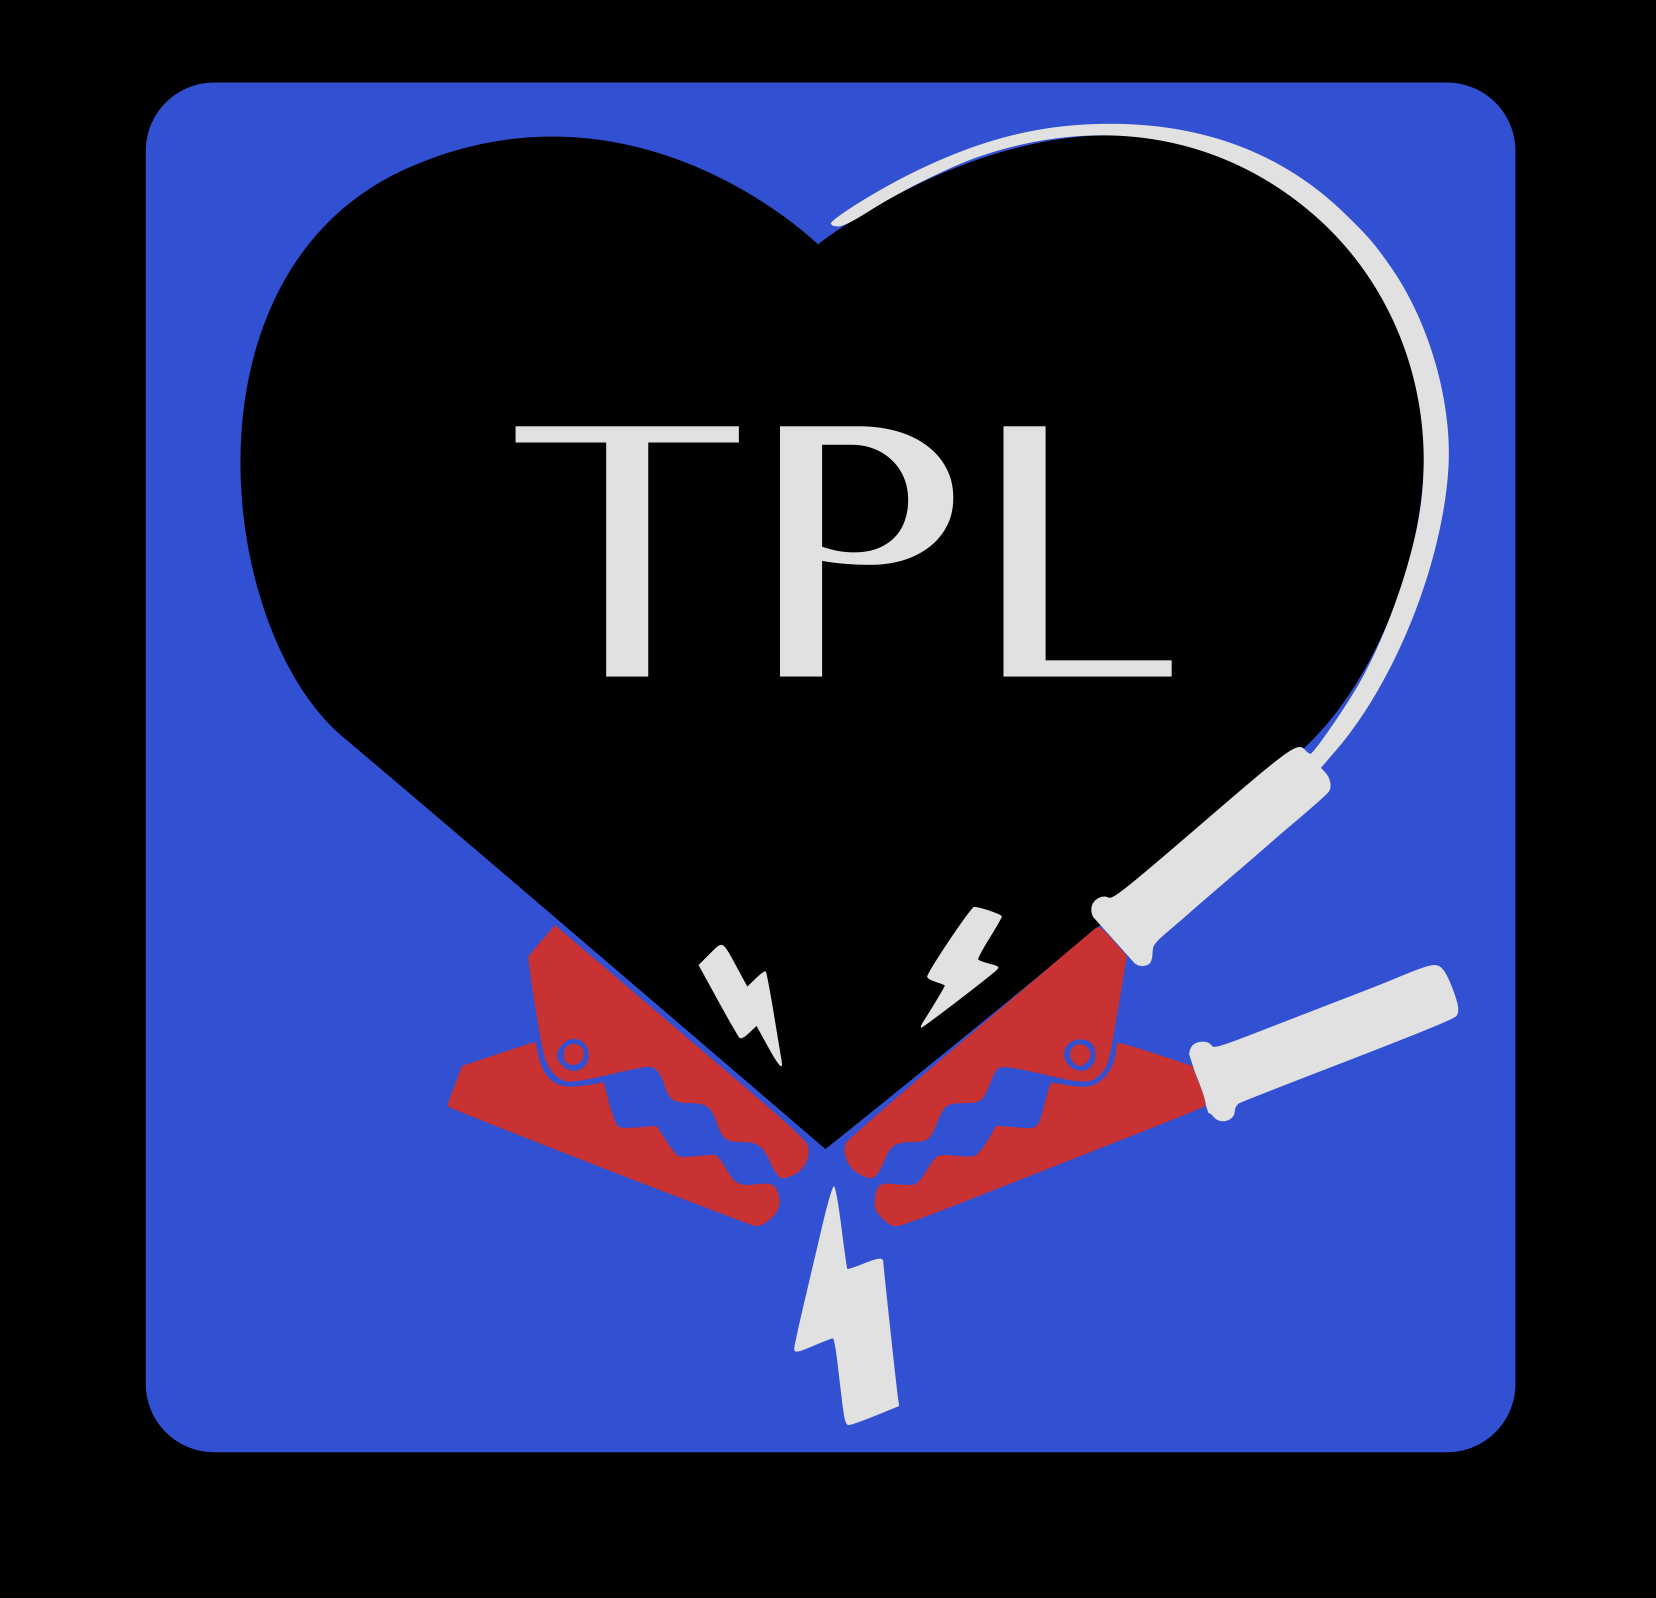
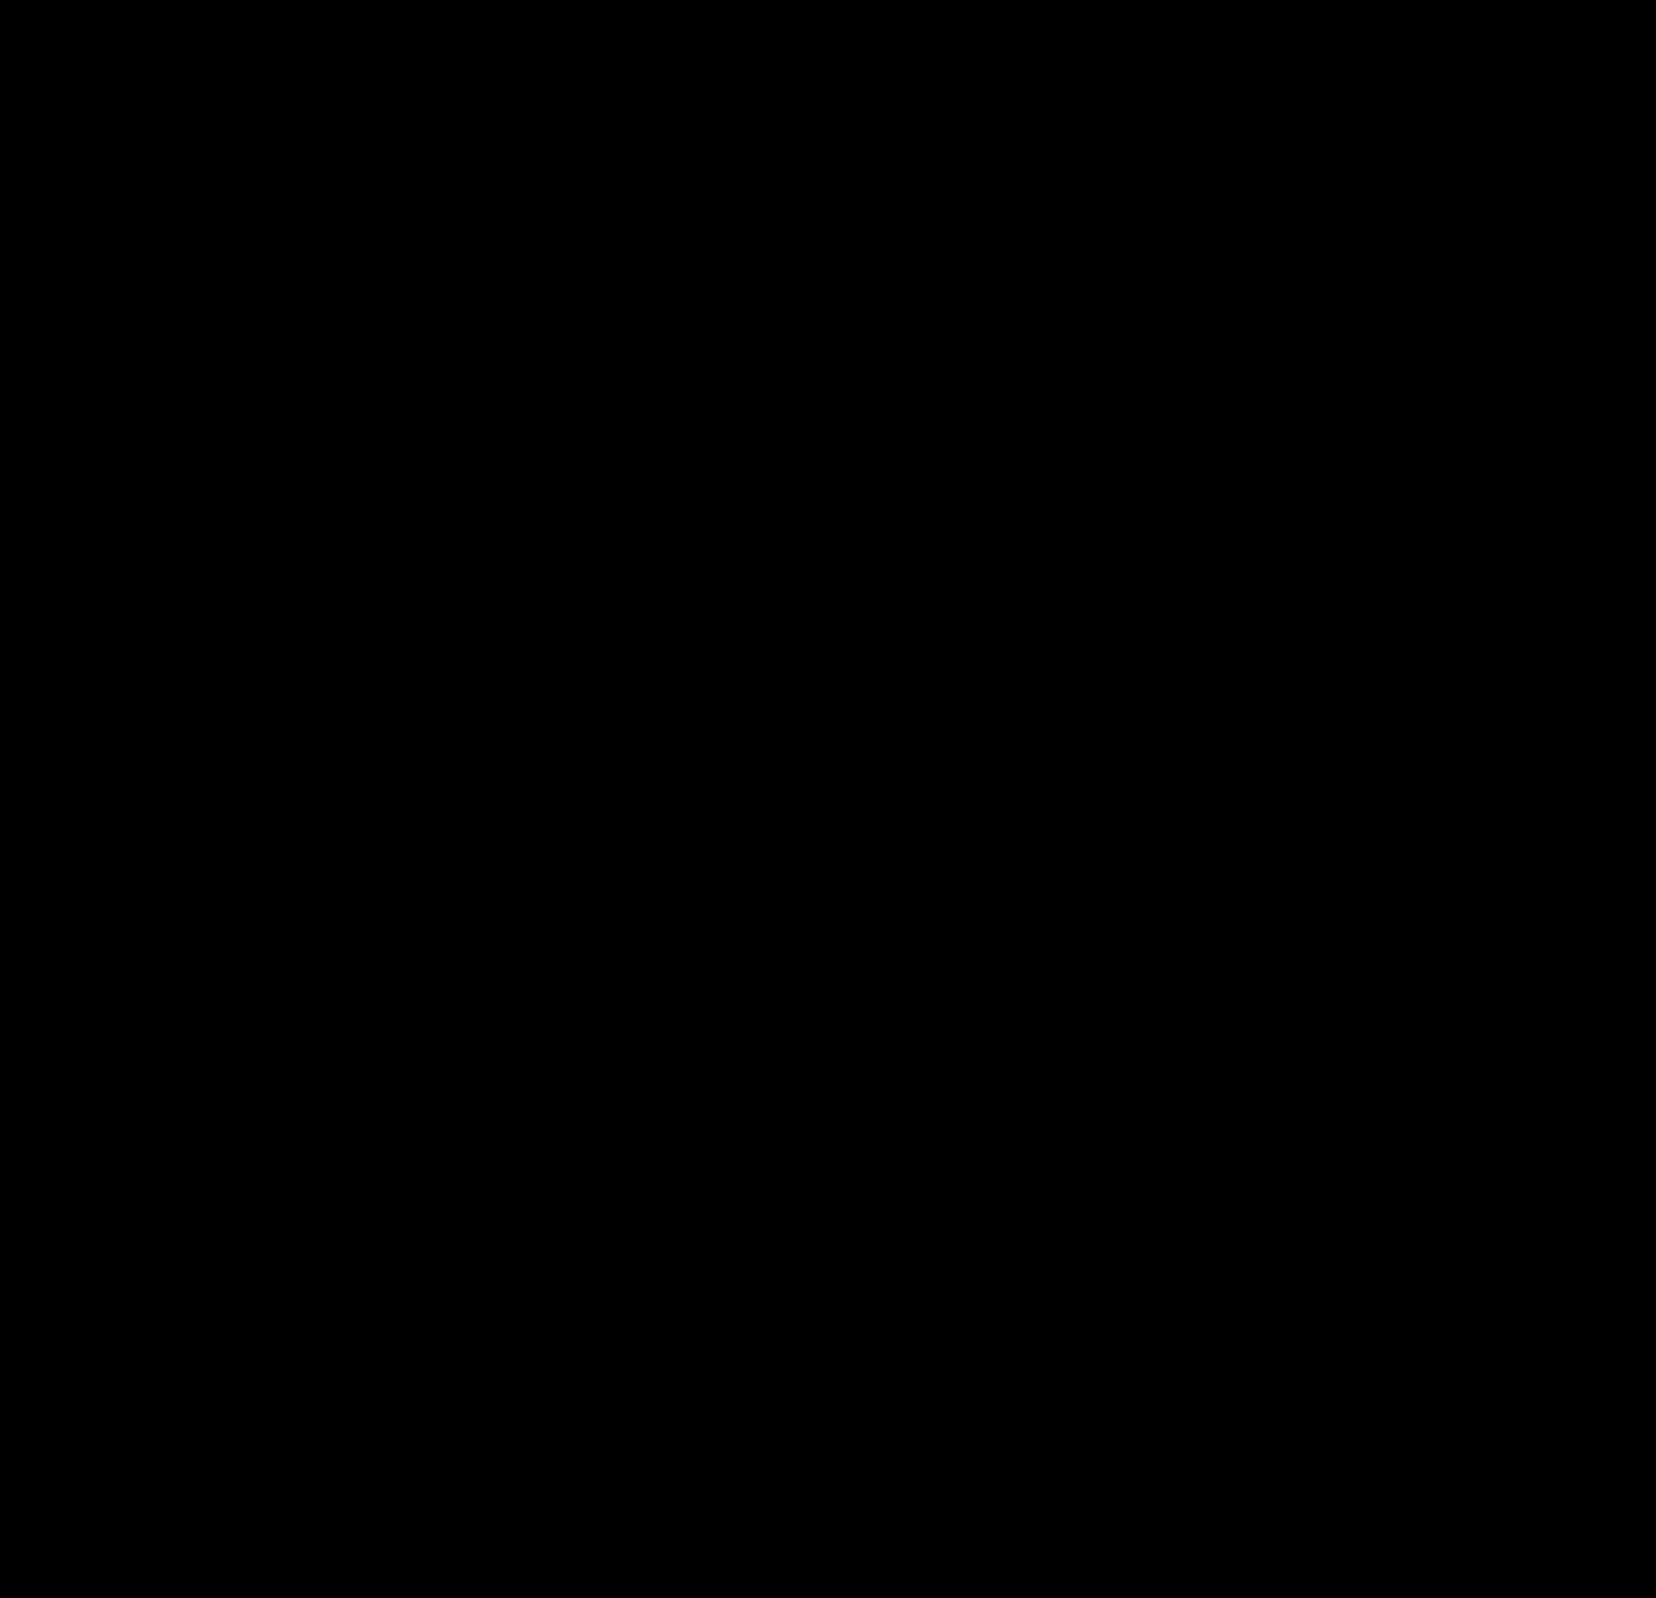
drawing: [145, 82, 1516, 1453] -> none

